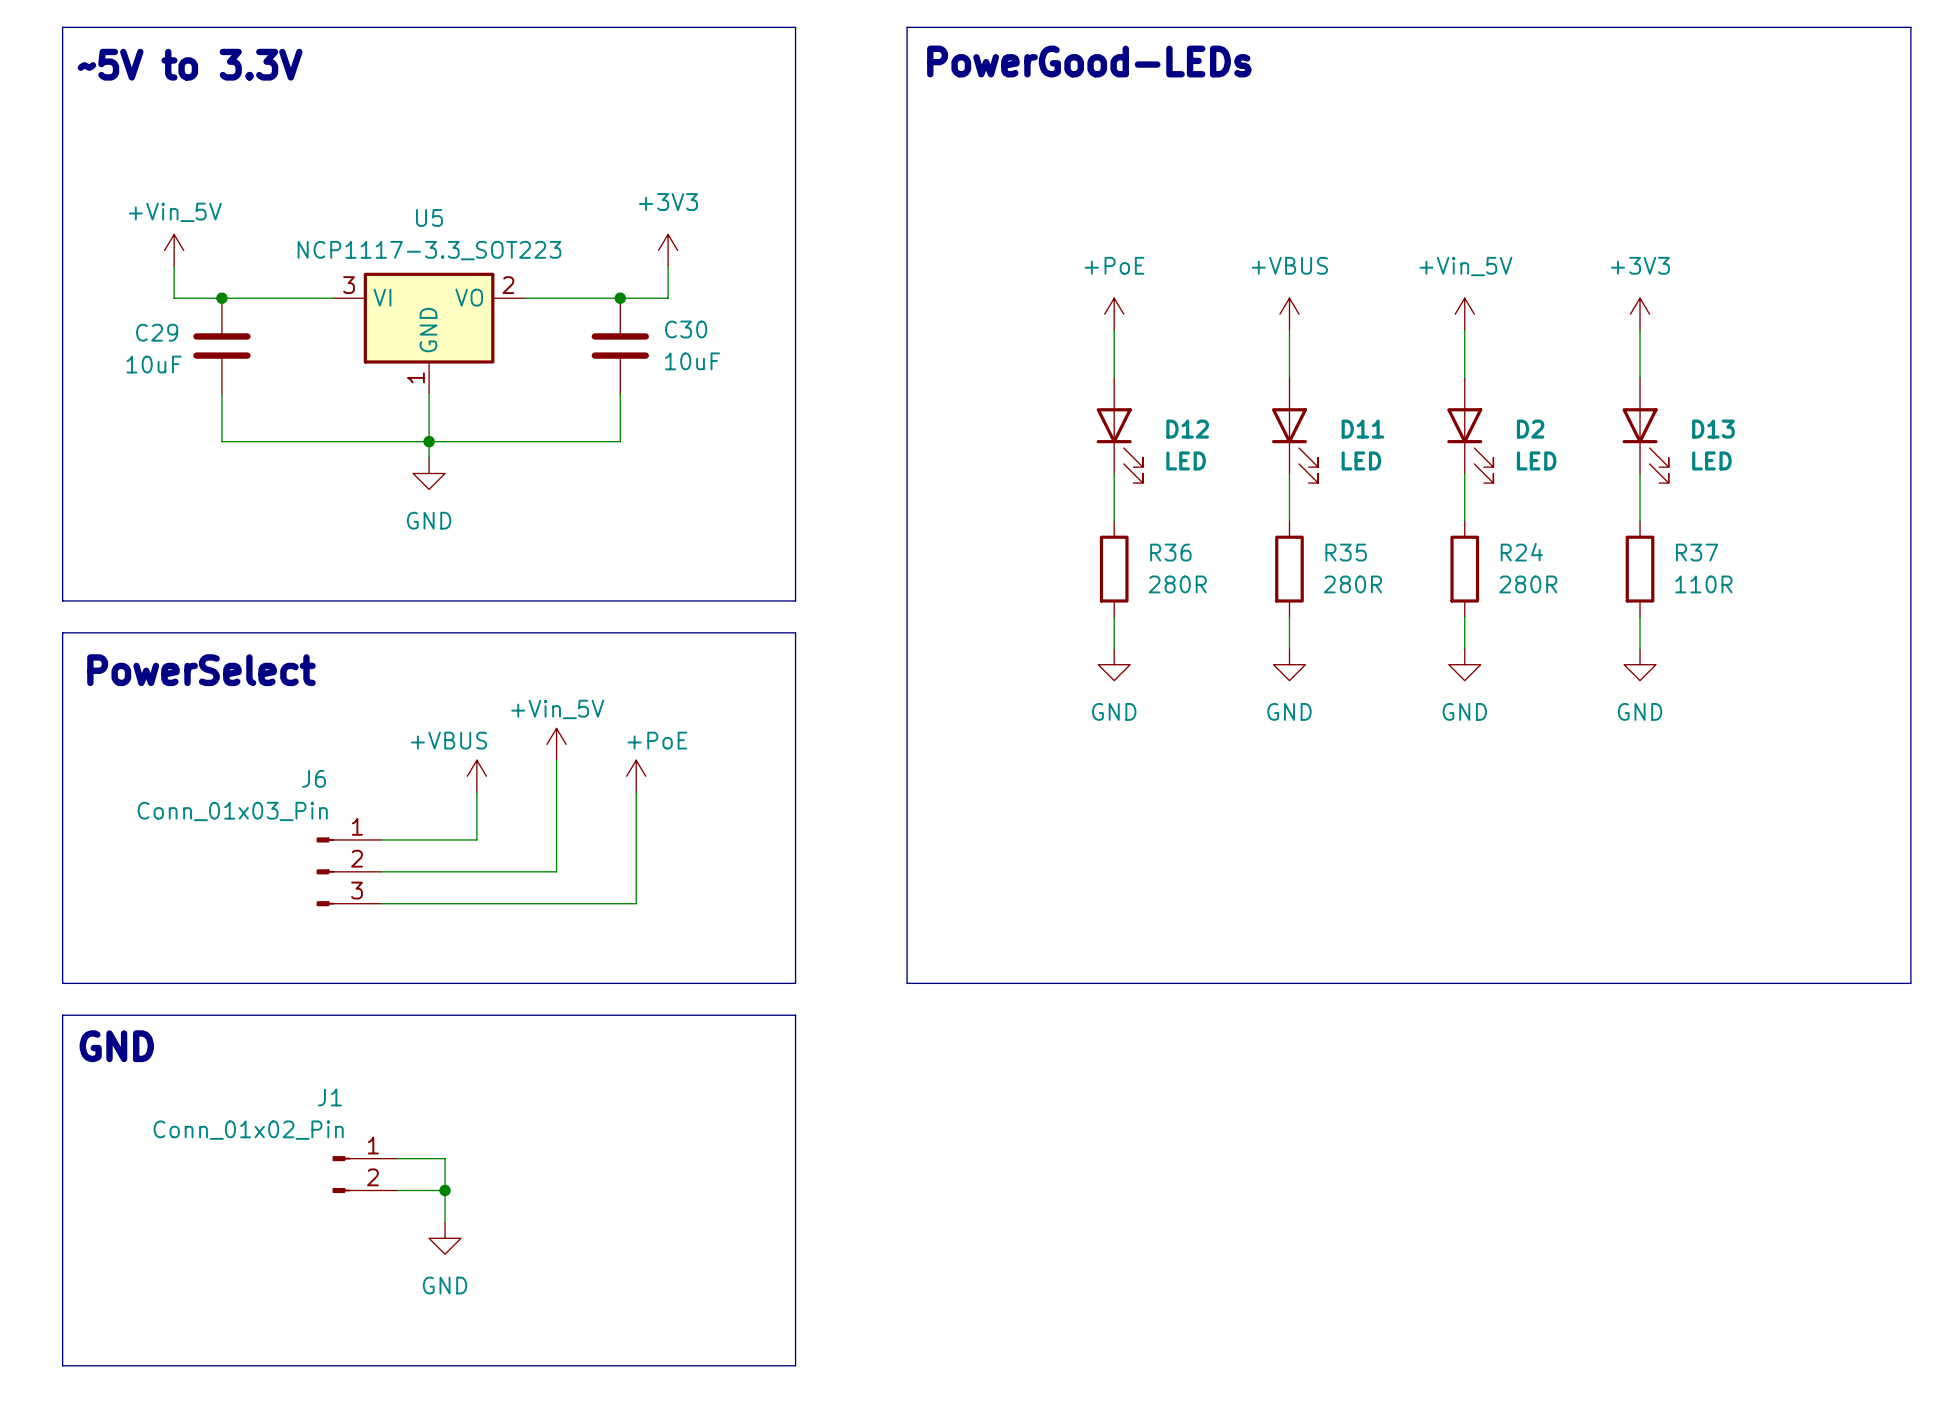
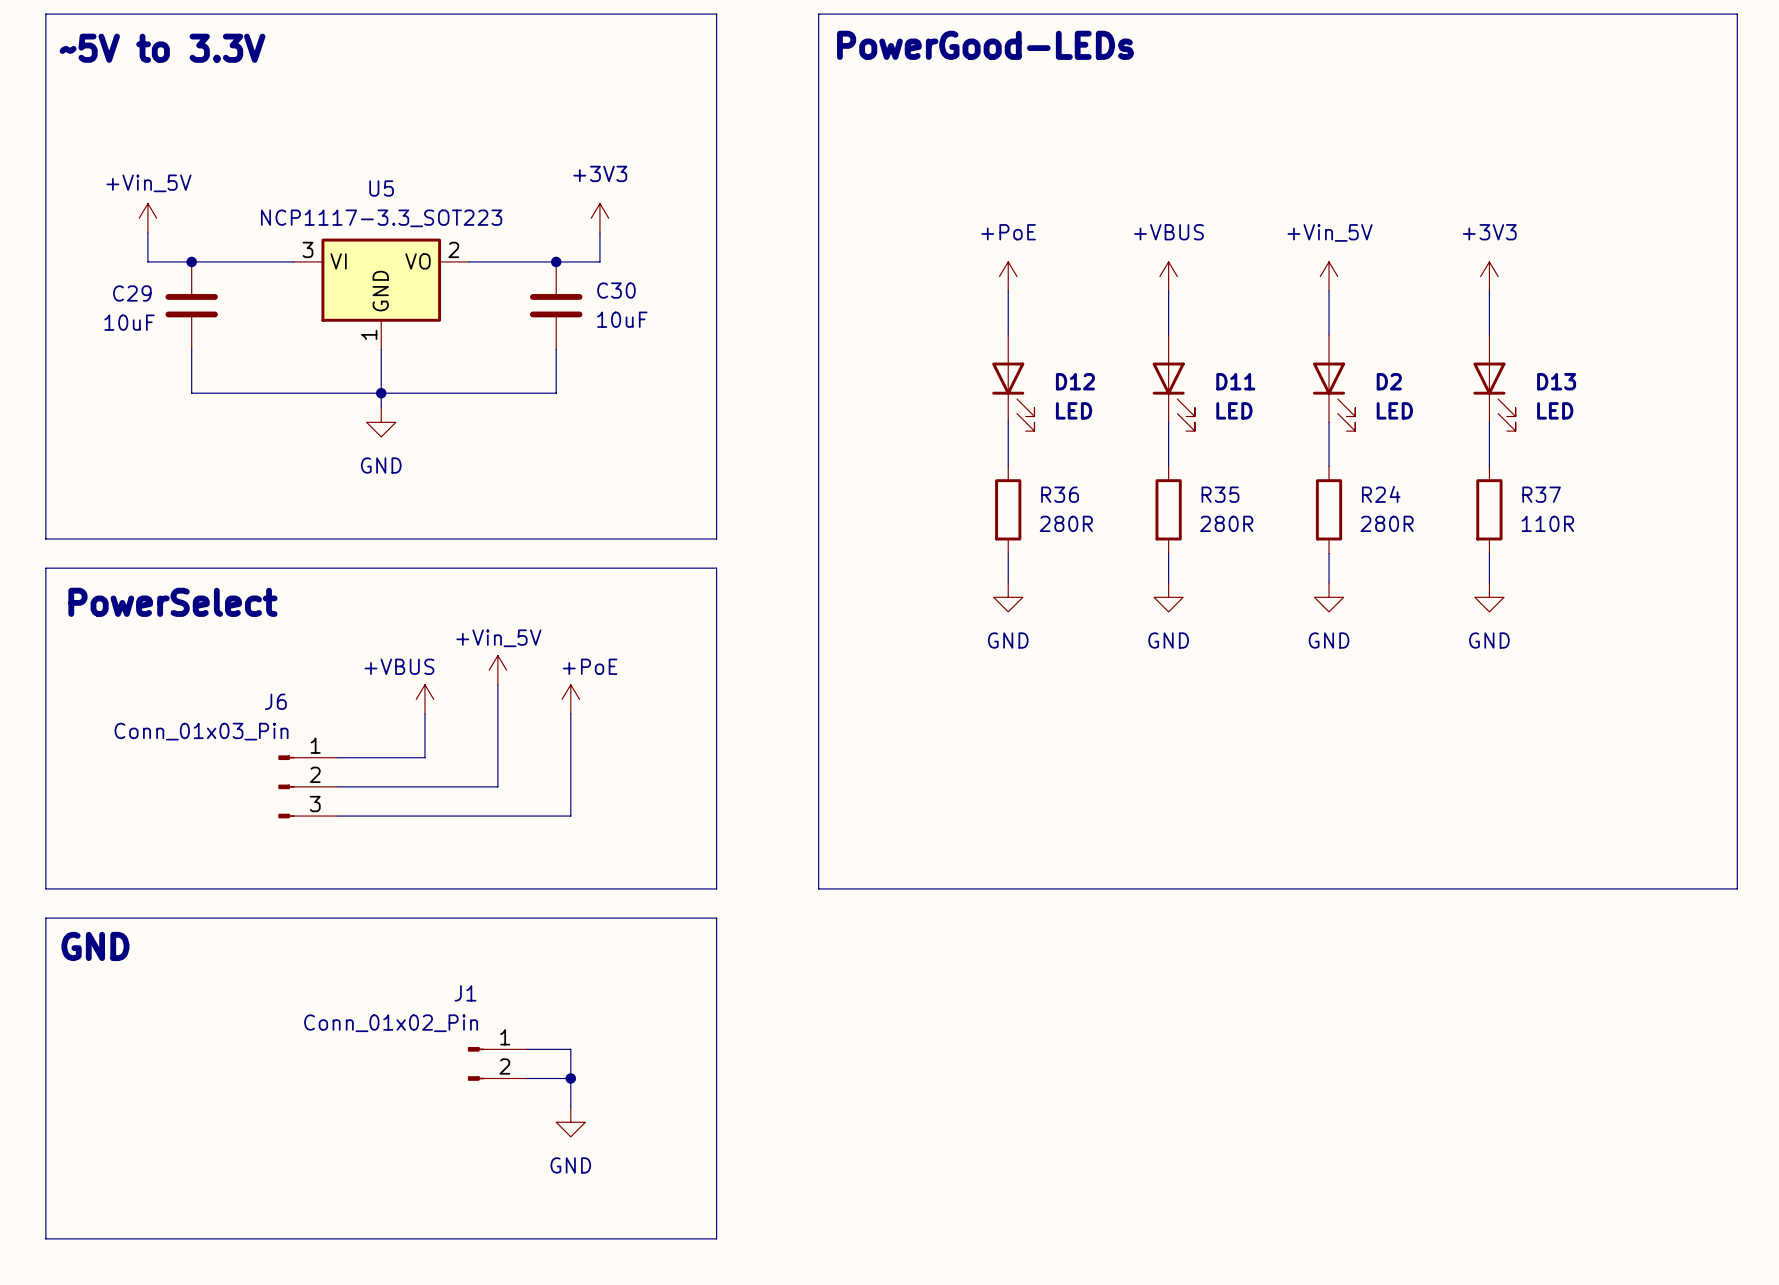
wire: (397, 1158) (445, 1158) (445, 1222) -> (527, 1049) (570, 1049) (570, 1107)
J1 position: (364, 1174) -> (497, 1063)
wire: (397, 1190) (445, 1190) -> (527, 1078) (570, 1078)
junction: (445, 1190) -> none
junction: none -> (570, 1078)
power symbol position: GND (445, 1238) -> GND (570, 1122)

